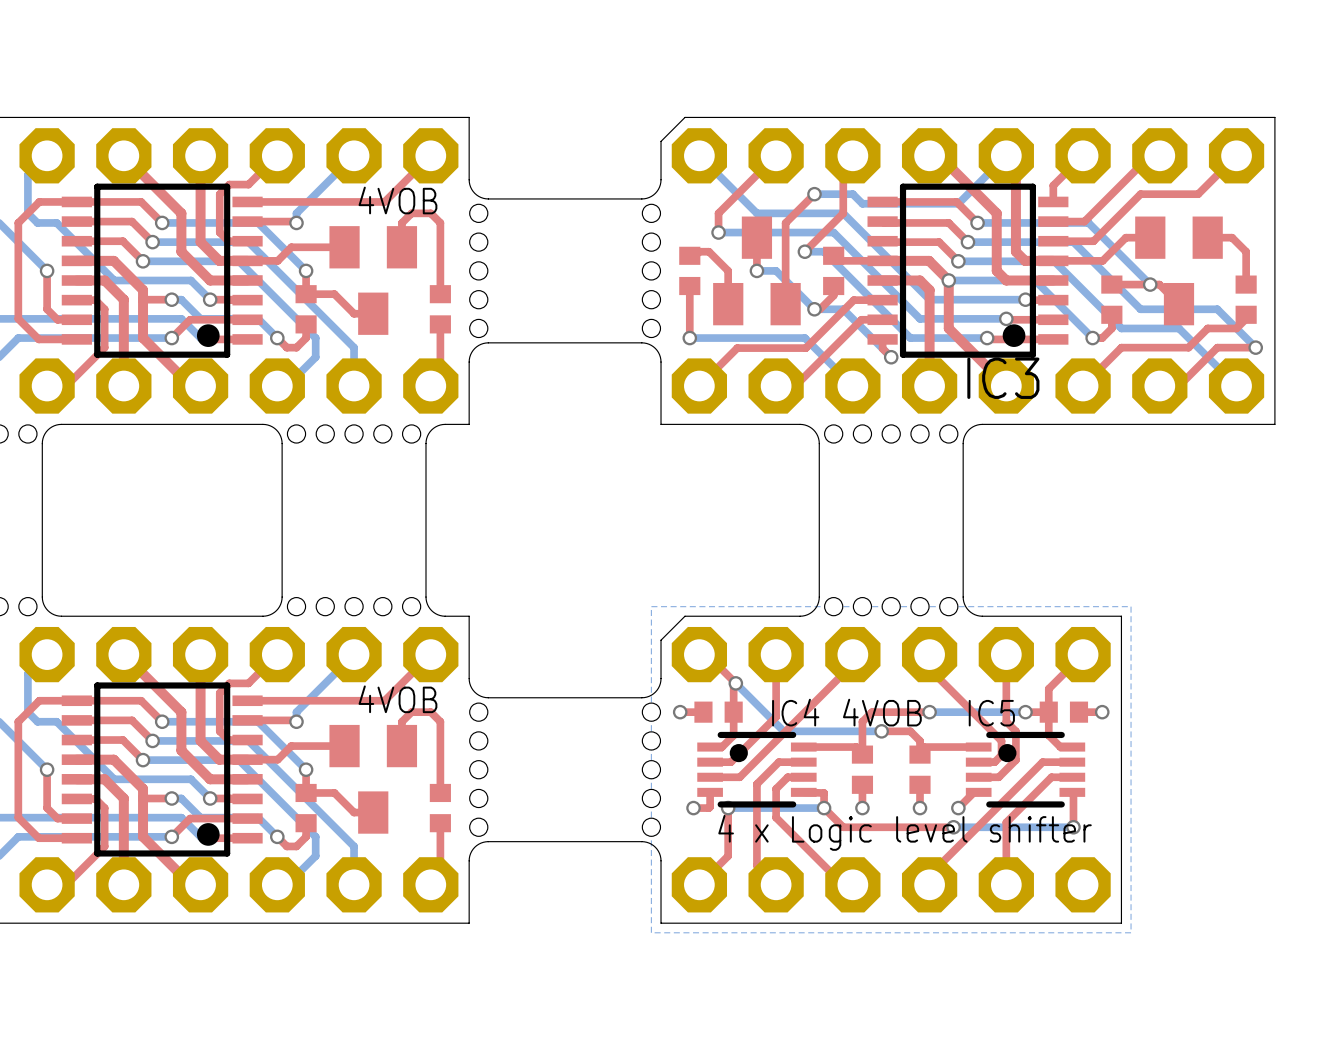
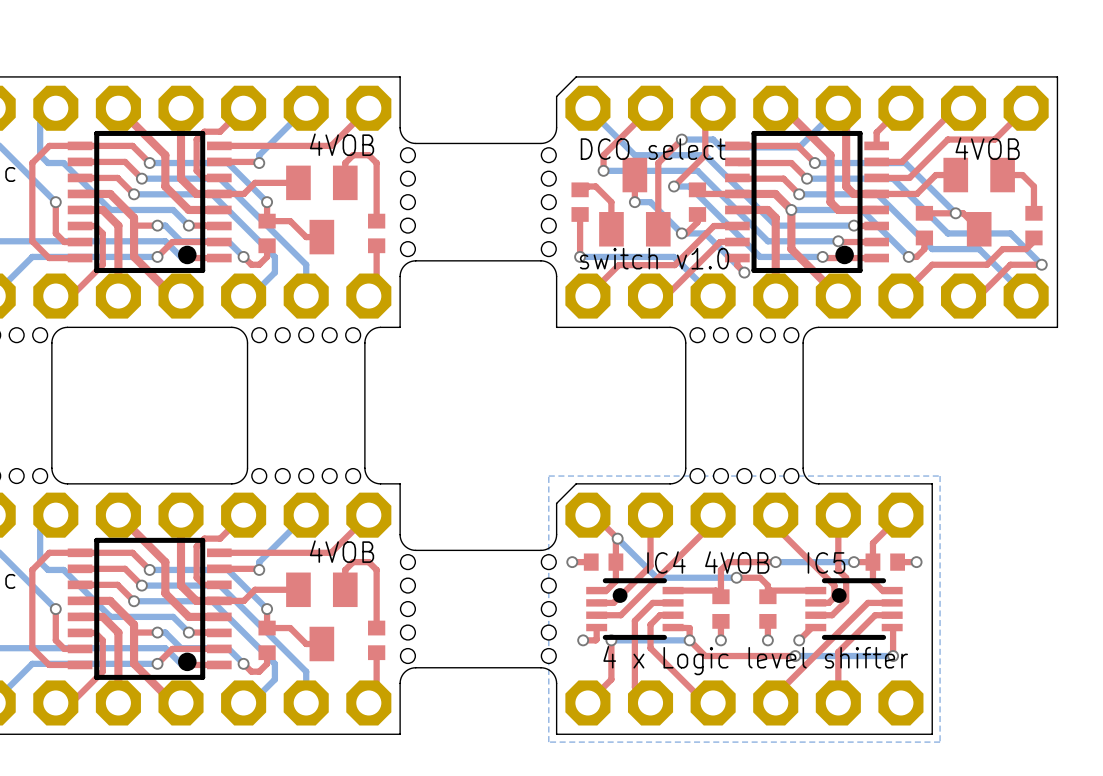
text: none -> DCO select (653, 149)
text: none -> 4VOB (987, 148)
text: none -> switch v1.0 (654, 258)
IC3 name: IC3 (1003, 378) -> none

